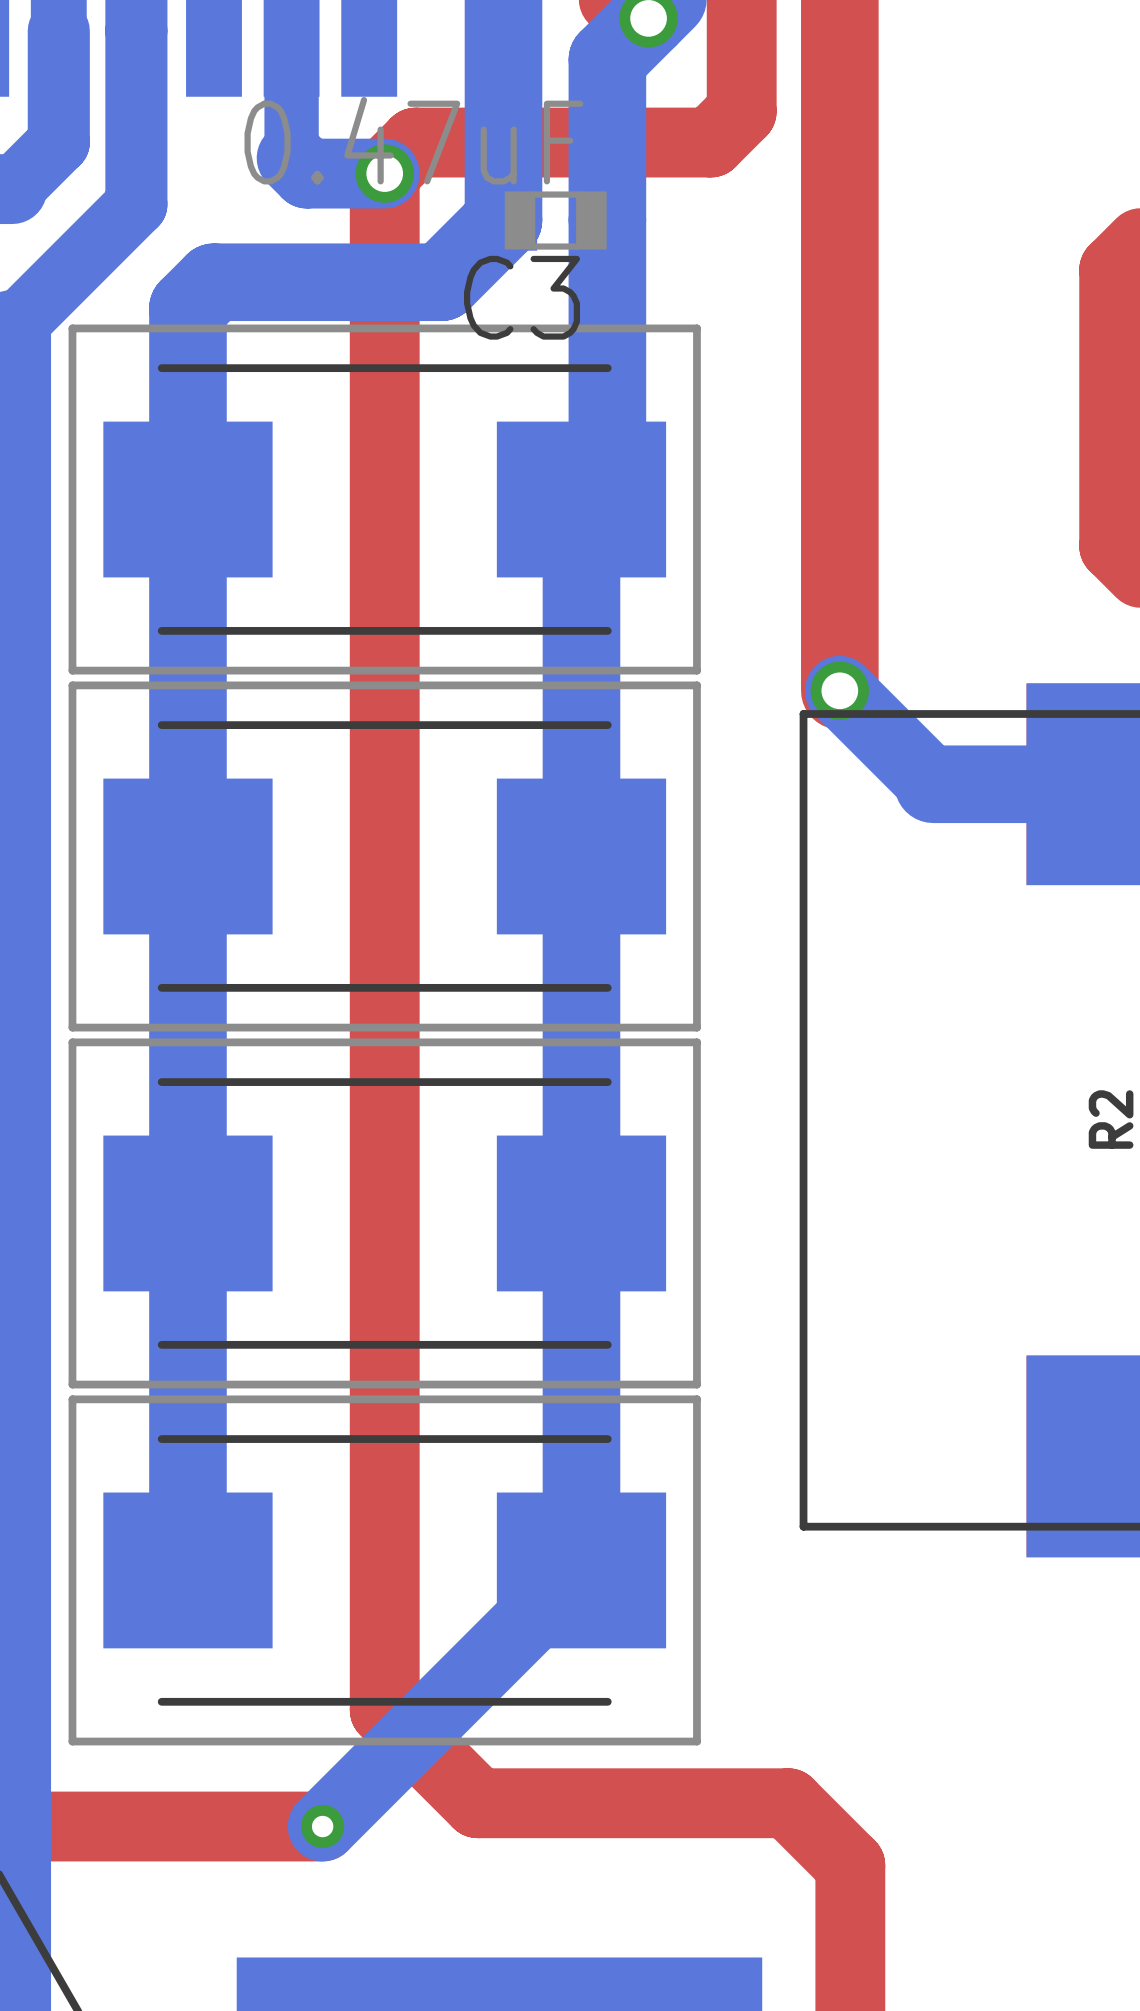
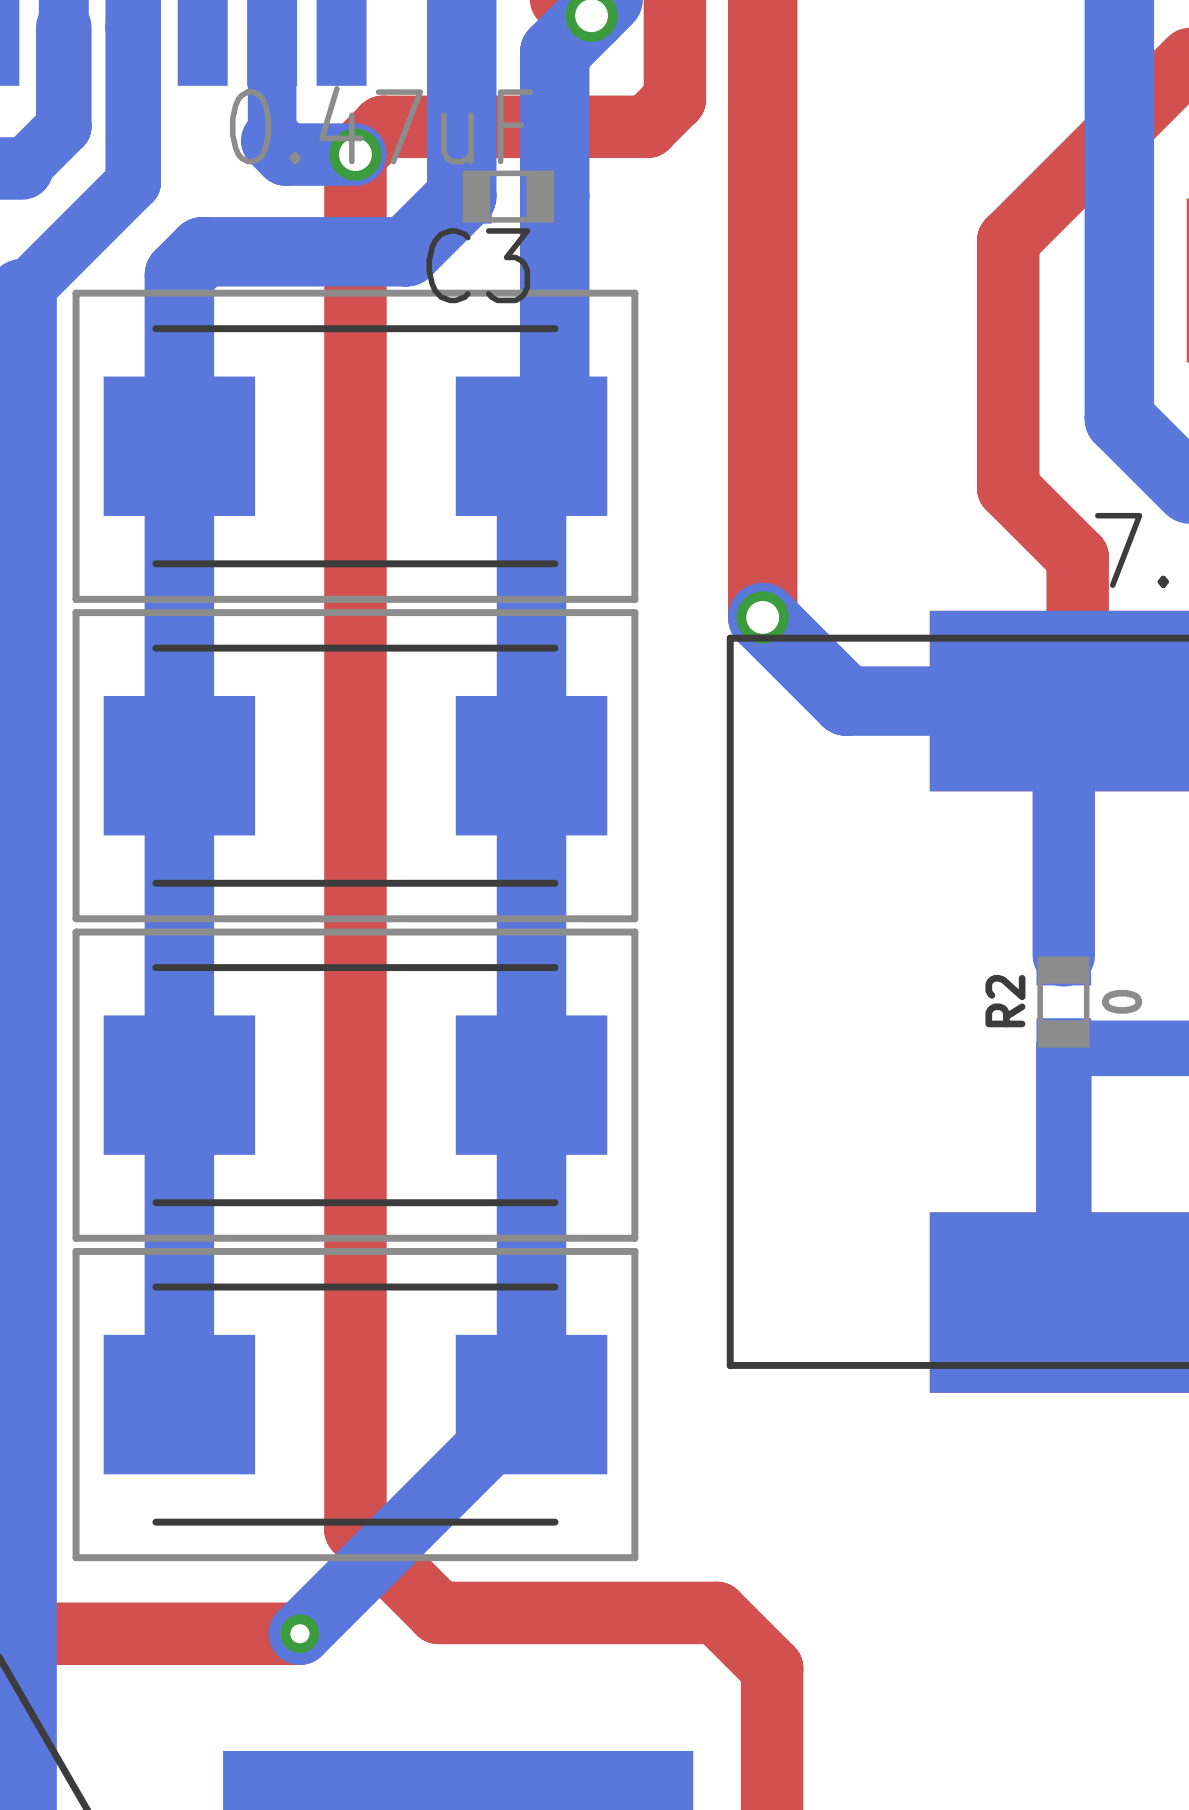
bottom track width: thin (839, 690) (933, 784) -> thick (762, 617) (846, 701)

